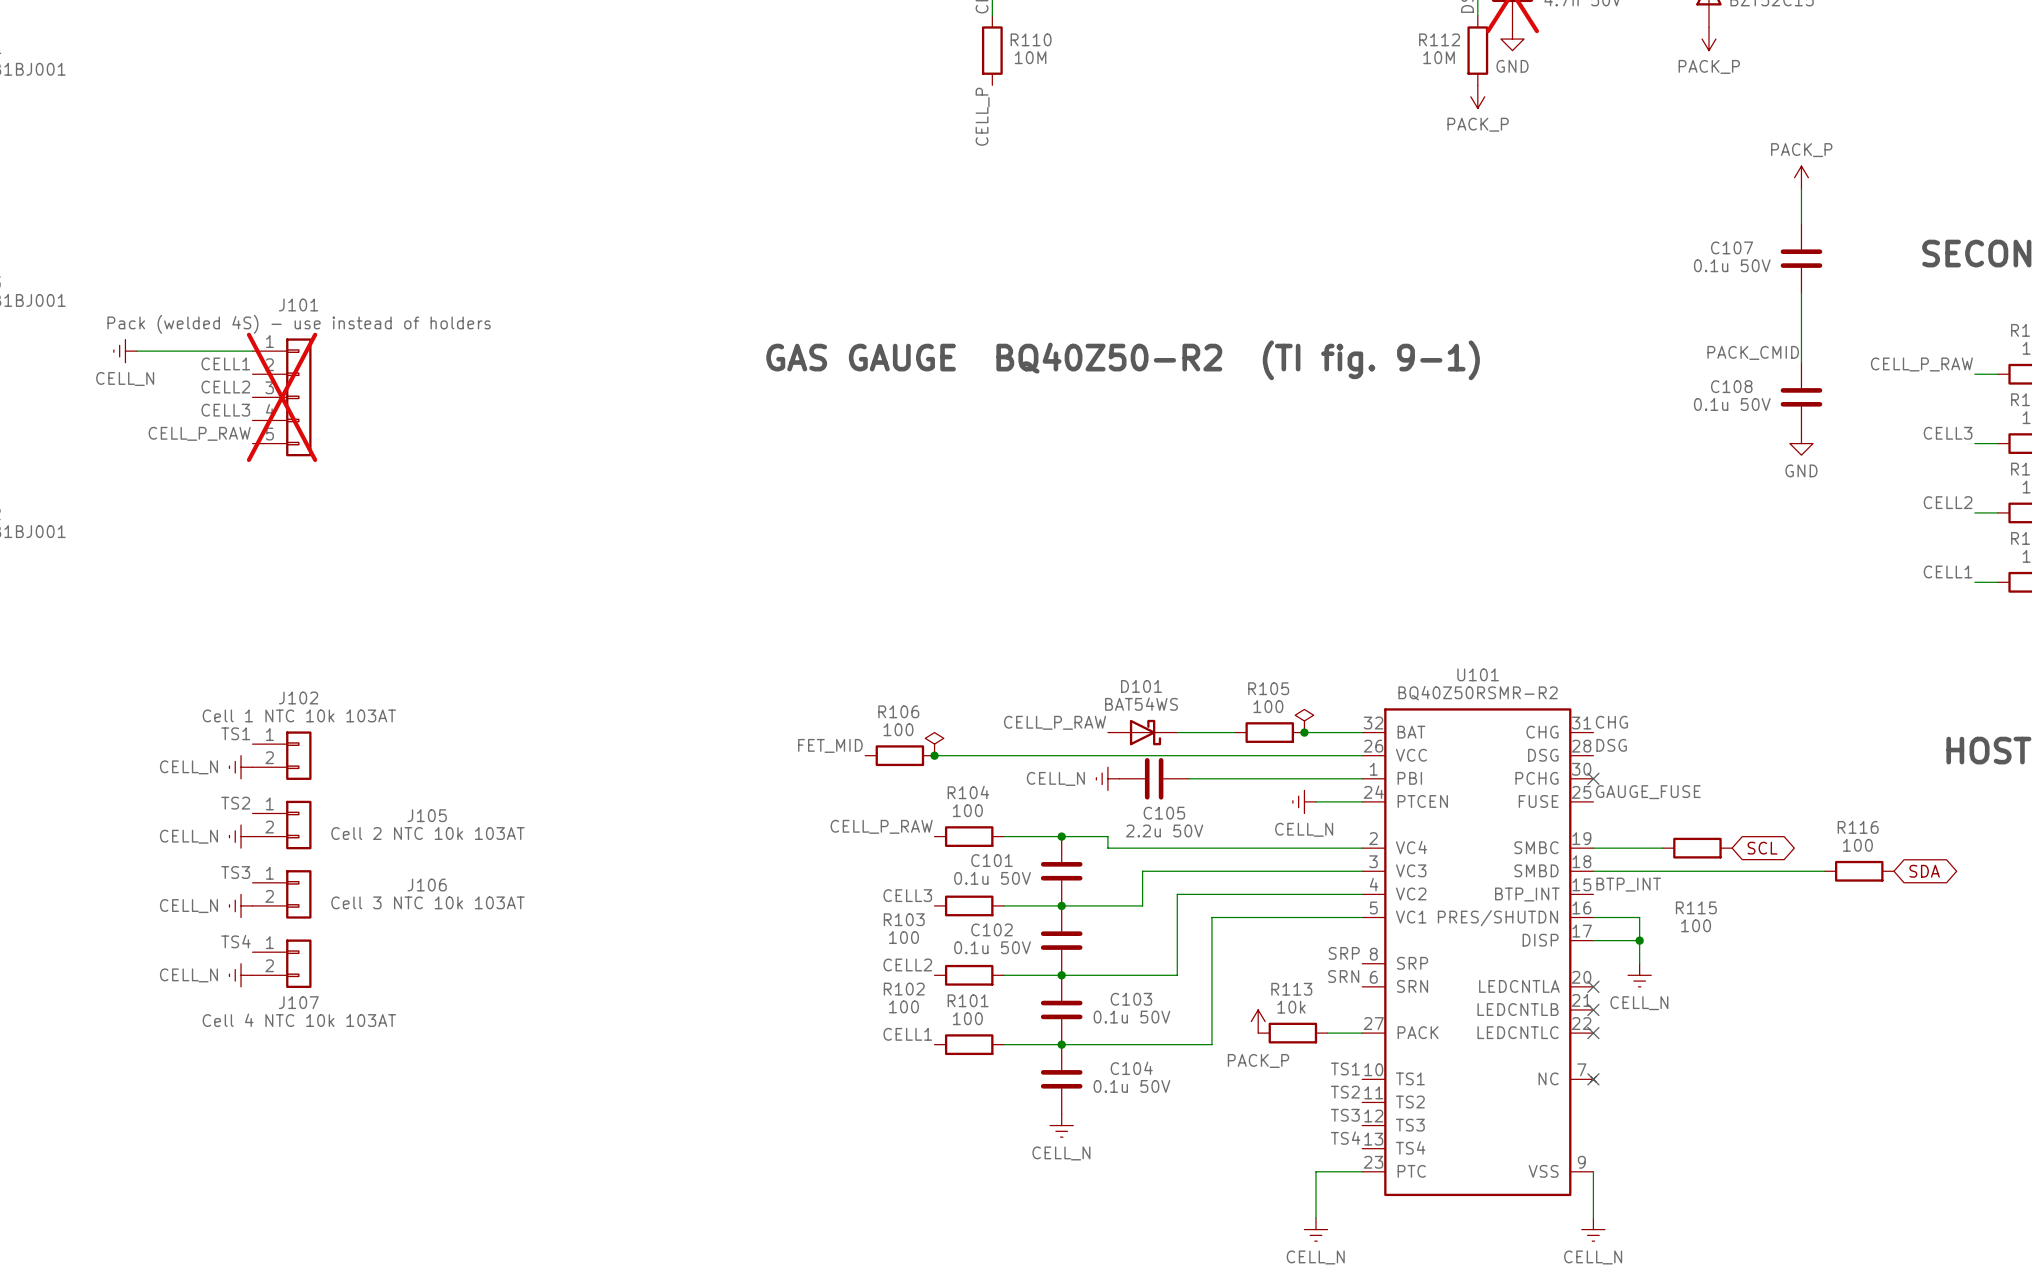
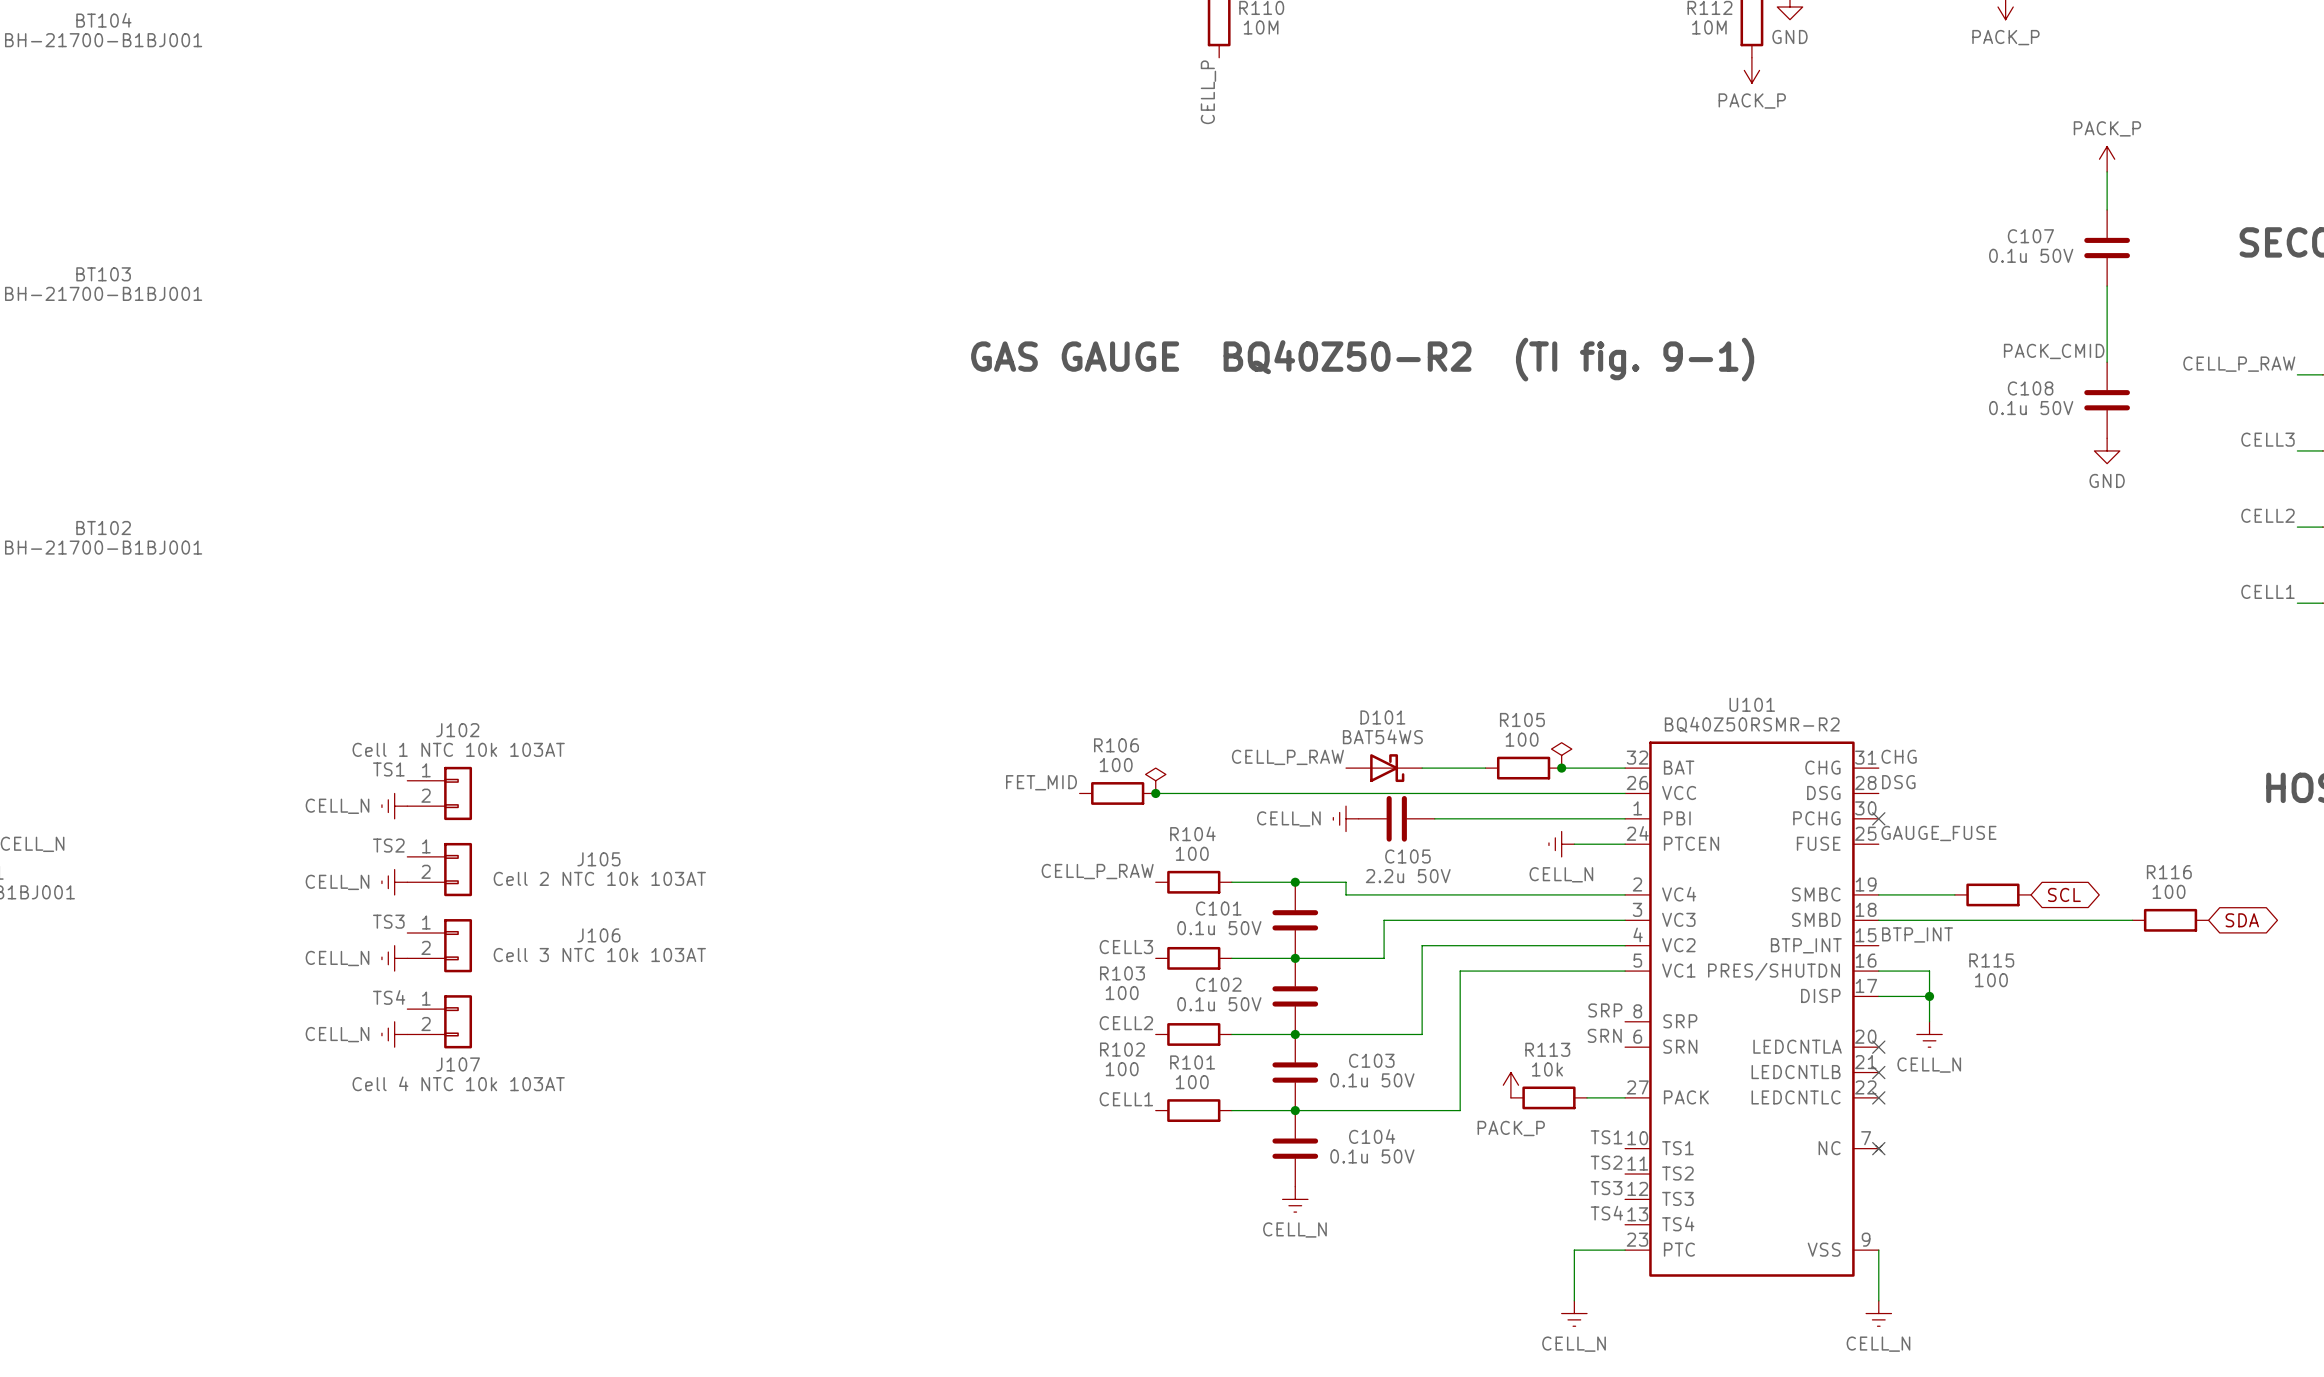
power symbol: CELL_N (125, 351) -> none
wire: (136, 351) (252, 351) -> none
label: CELL1 (225, 363) -> none
label: CELL2 (225, 387) -> none
J101: Pack (welded 4S) - use instead of holders (282, 397) -> none
label: CELL3 (225, 410) -> none
label: CELL_P_RAW (199, 433) -> none

